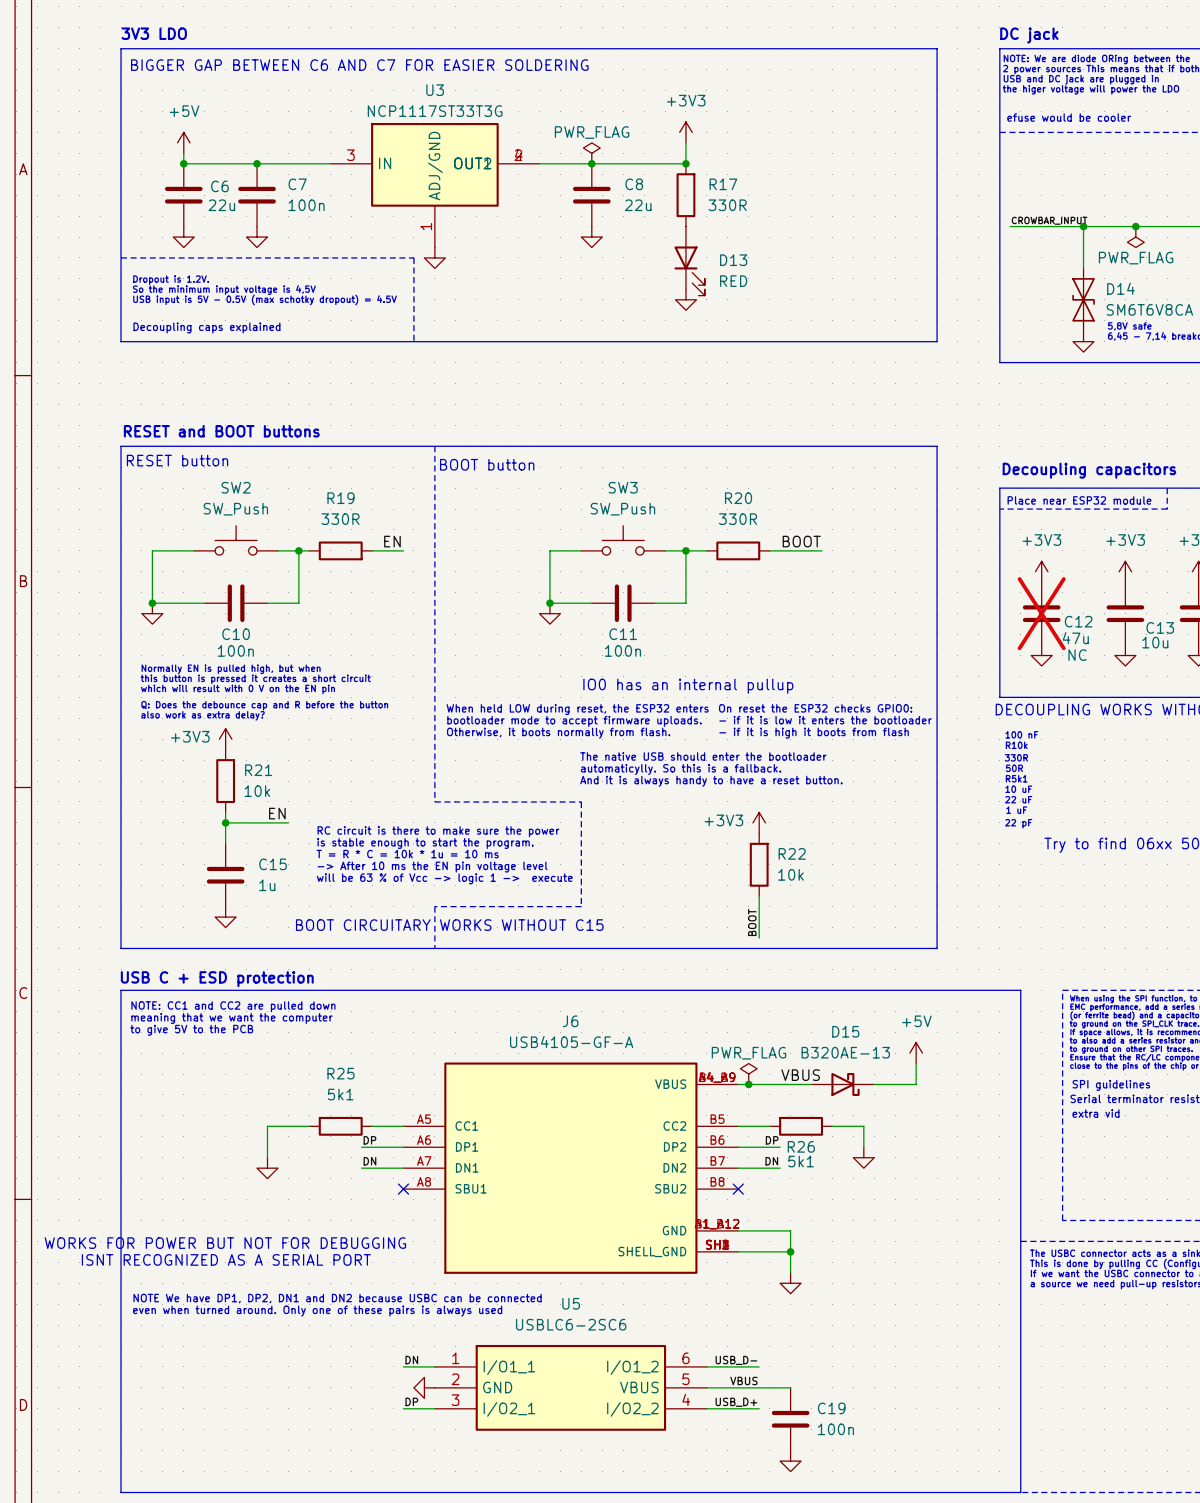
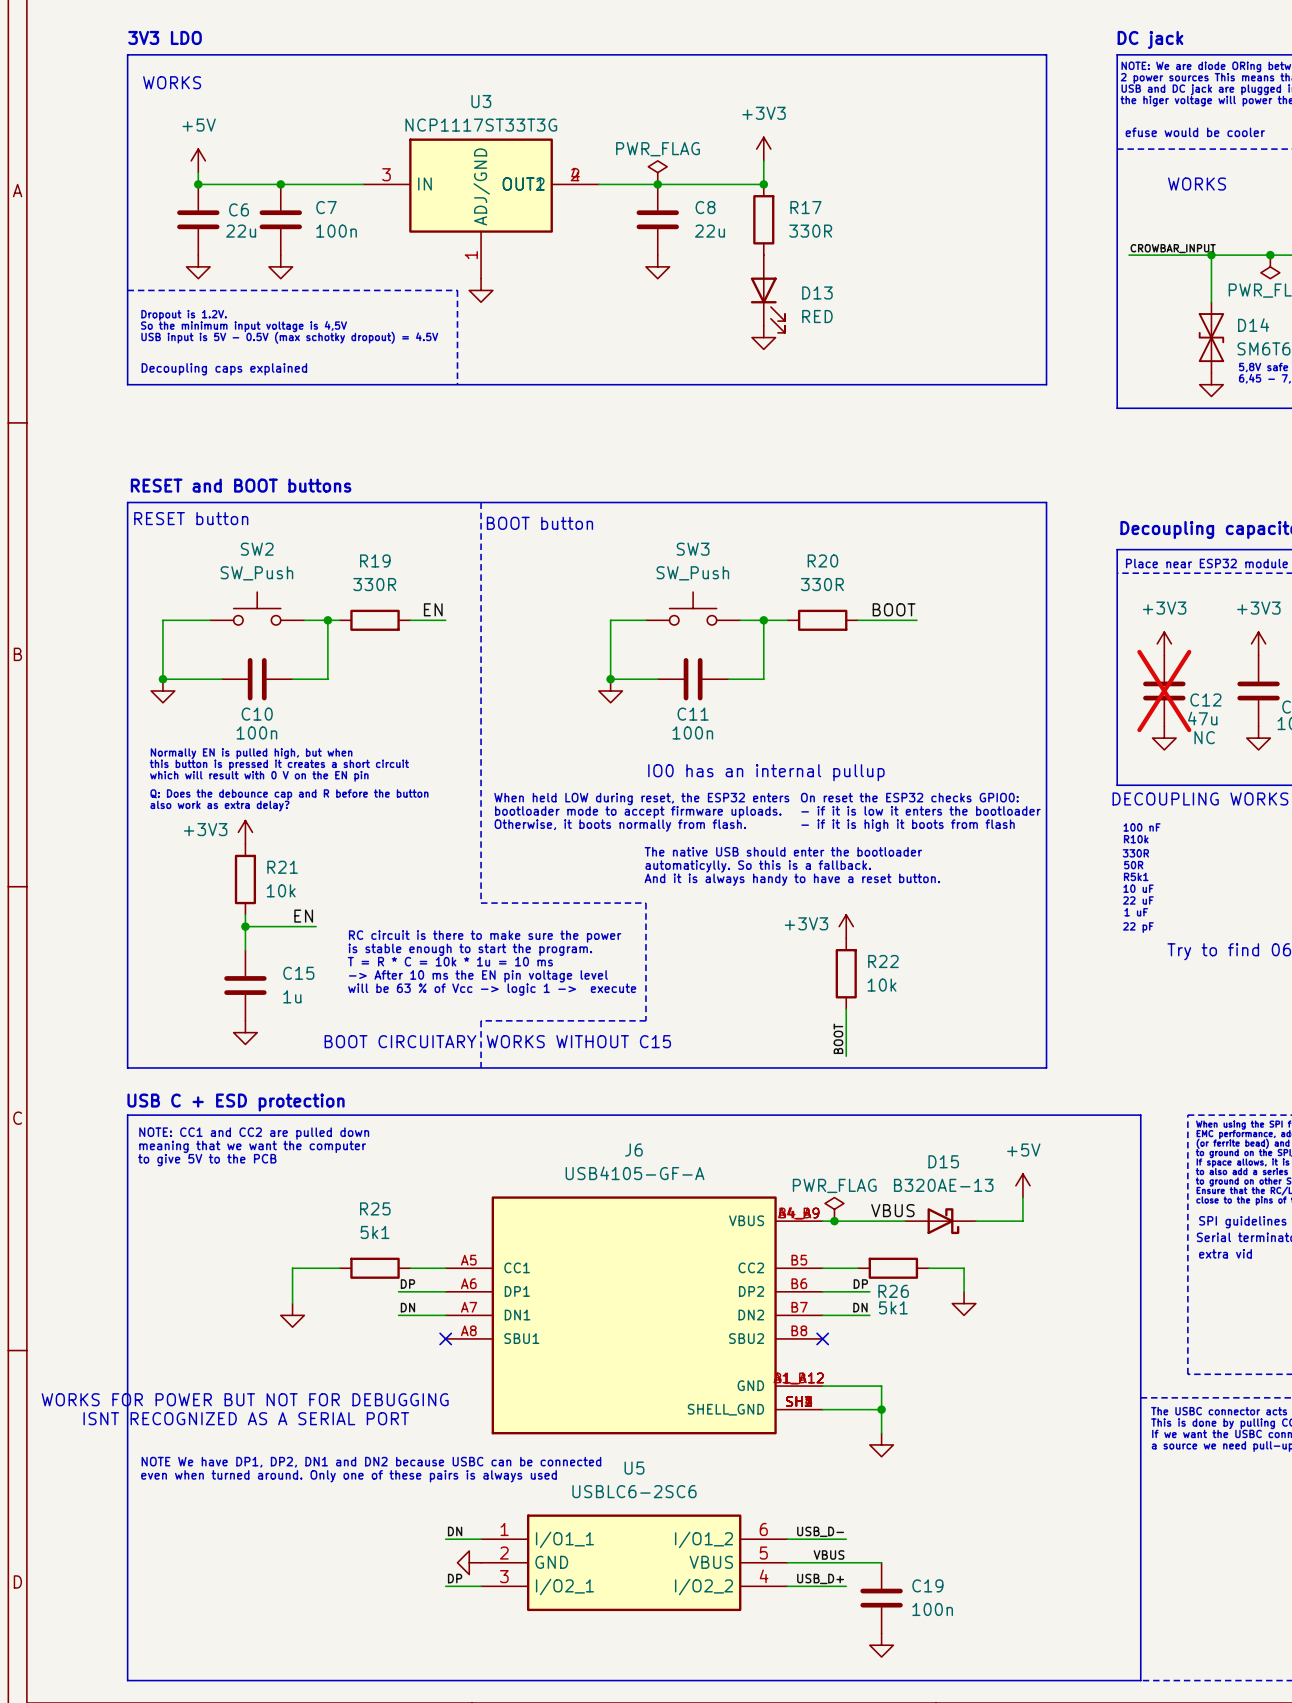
text: BIGGER GAP BETWEEN C6 AND C7 FOR EASIER SOLDERING (359, 65) -> none
text: none -> WORKS (172, 82)
text: none -> WORKS (1197, 184)

